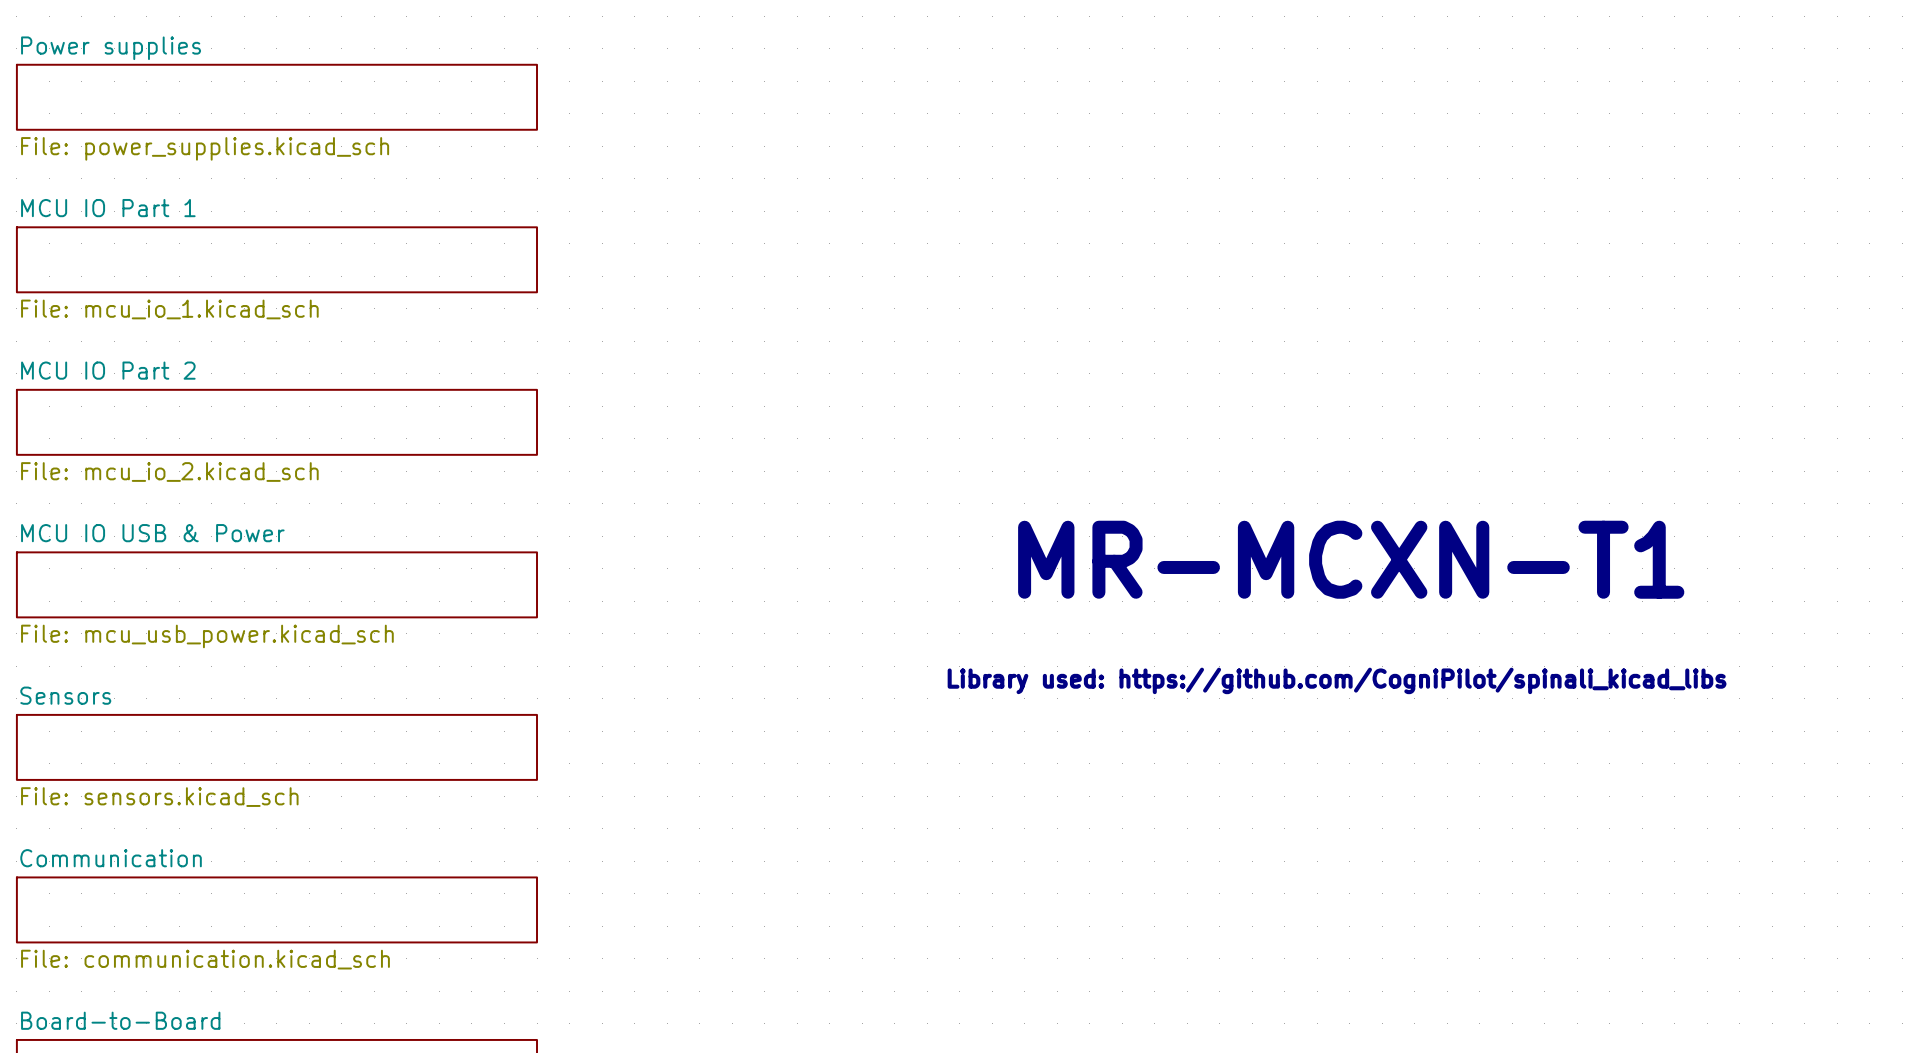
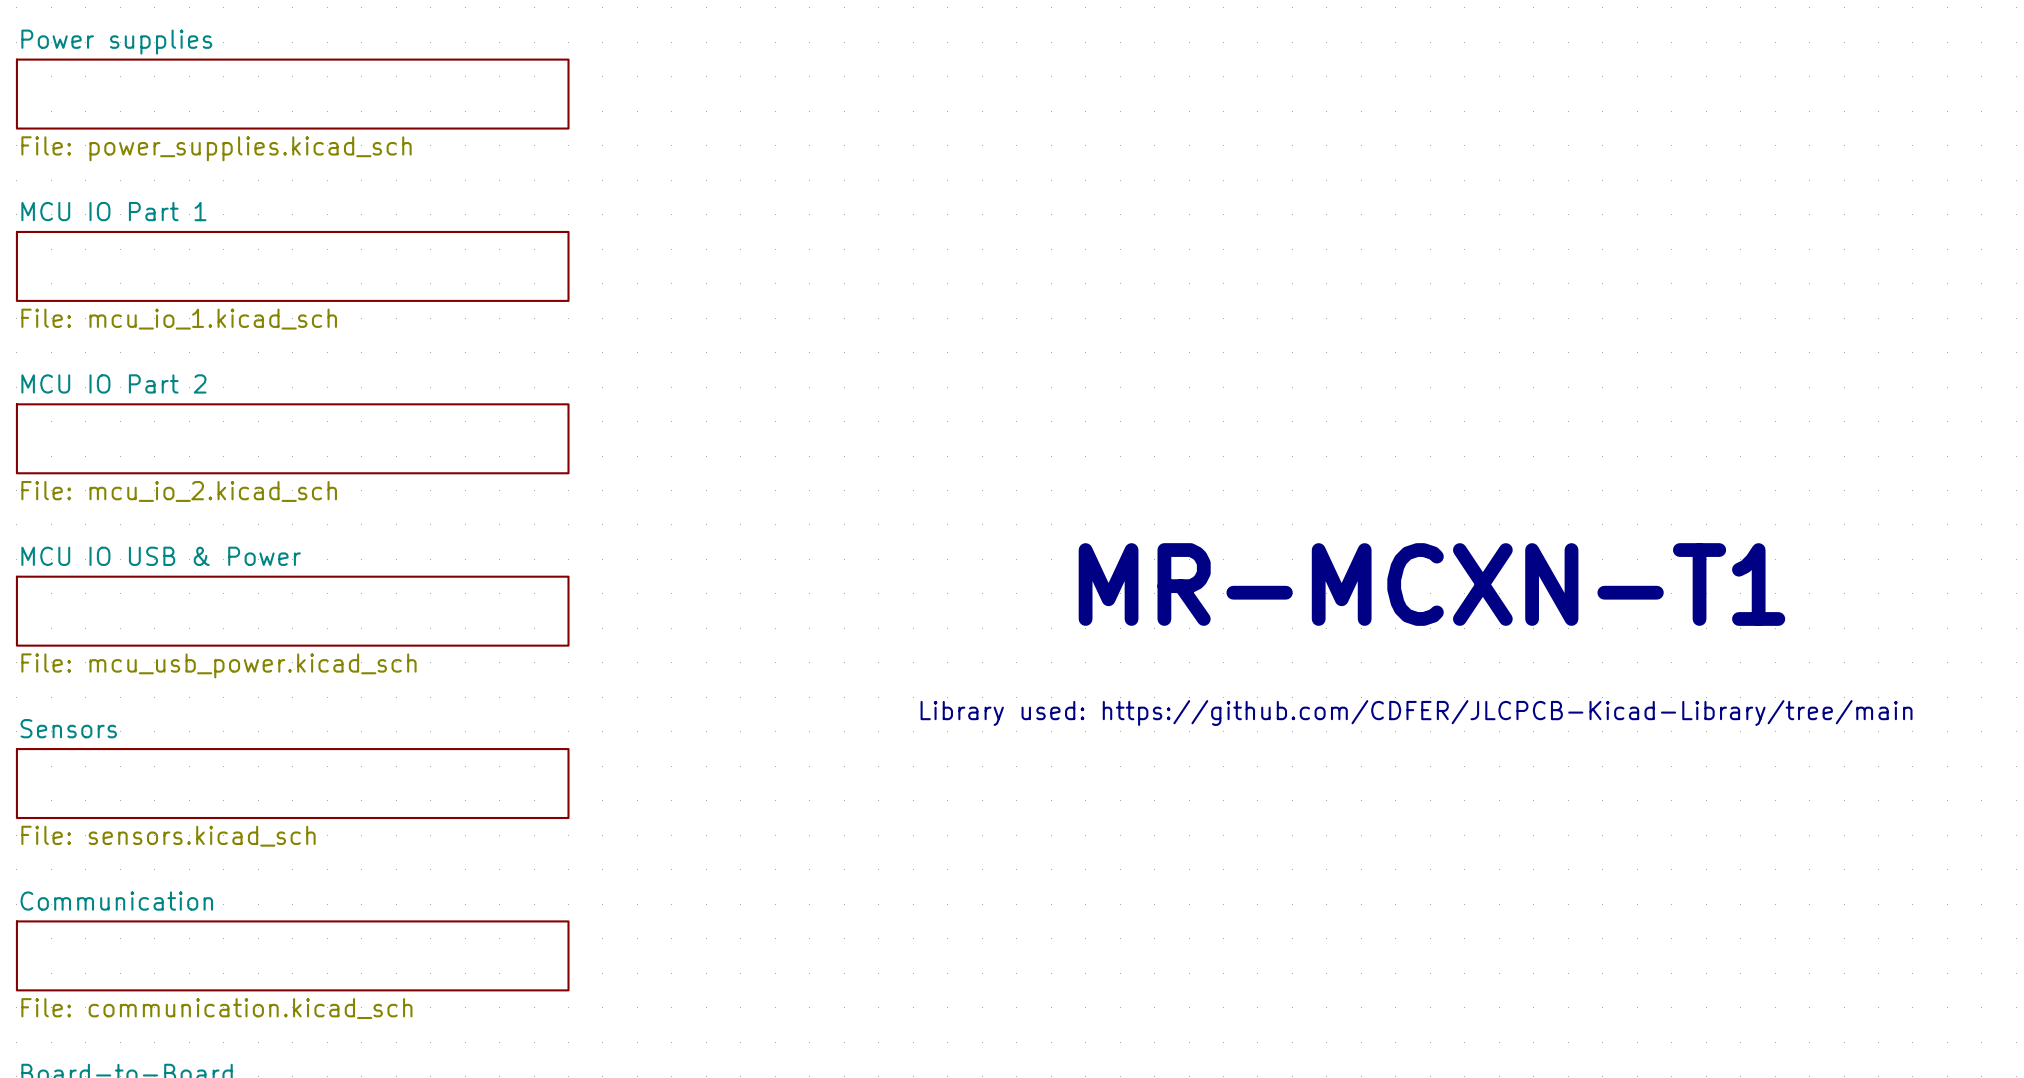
text: Library used: https://github.com/CogniPilot/spinali_kicad_libs (1337, 680) -> Library used: https://github.com/CDFER/JLCPCB-Kicad-Library/tree/main (1416, 713)

